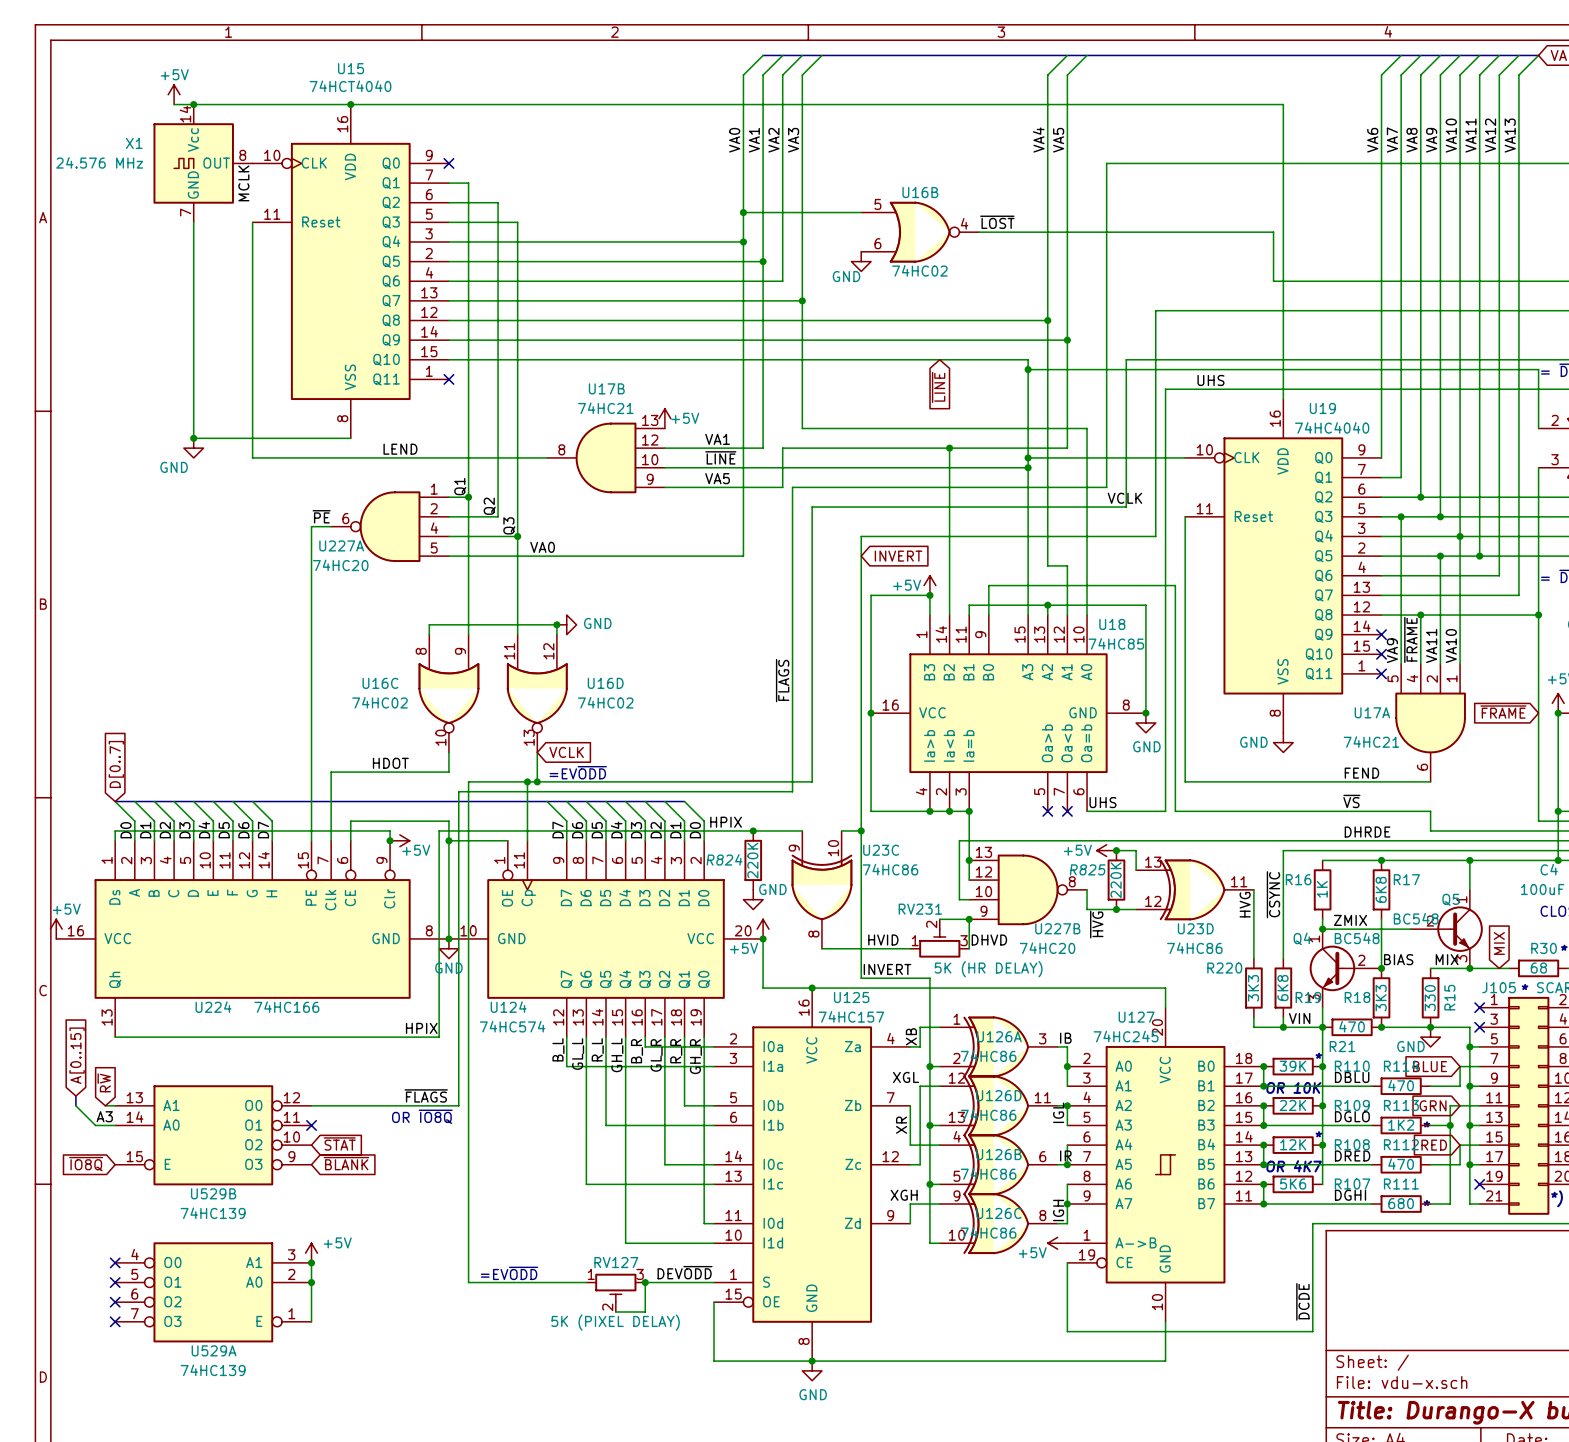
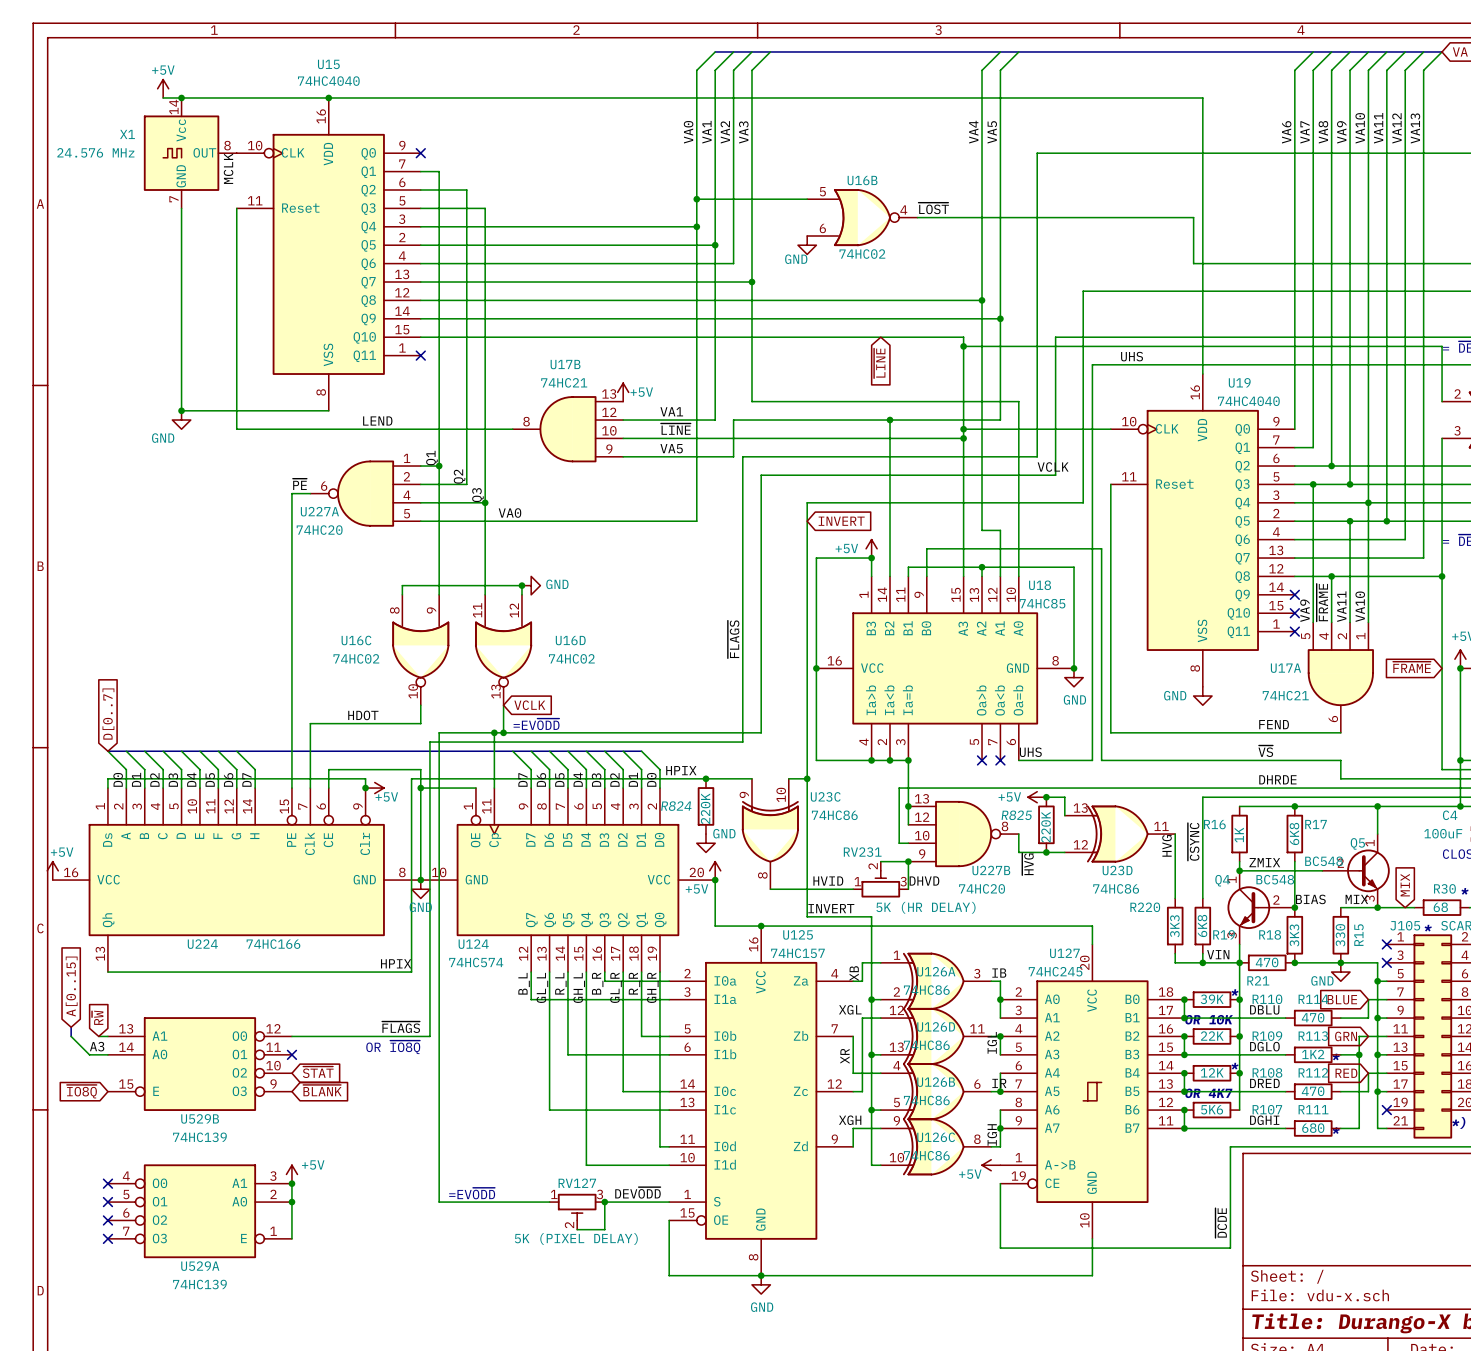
U15 value: 74HCT4040 (350, 86) -> 74HC4040 (328, 81)

